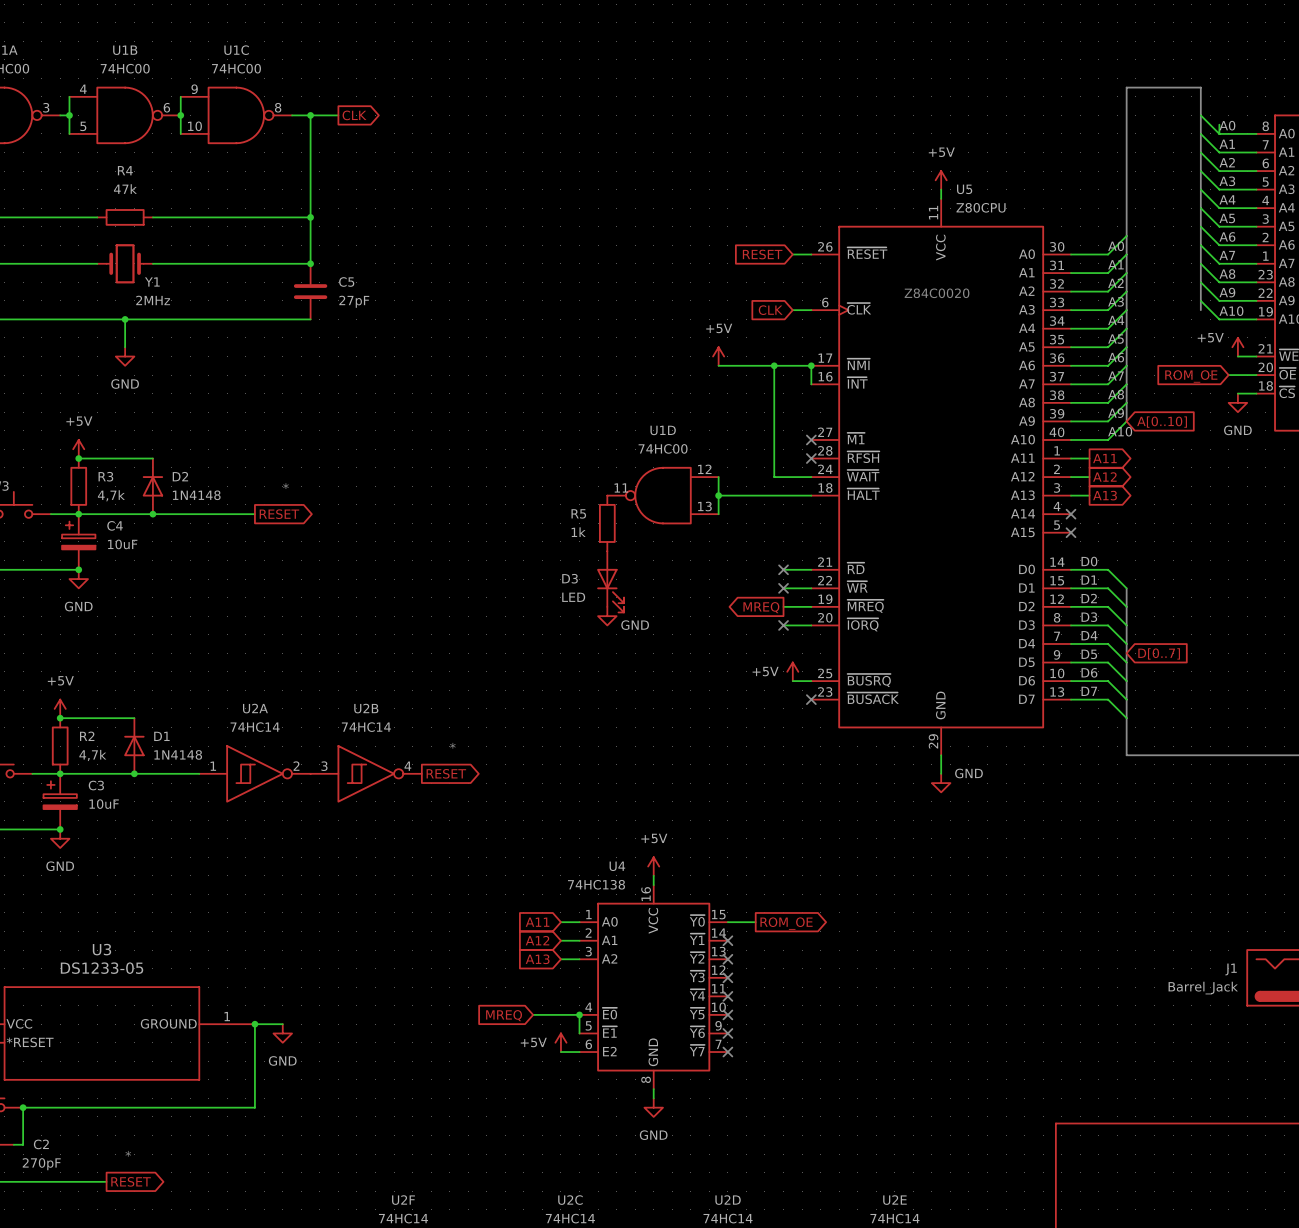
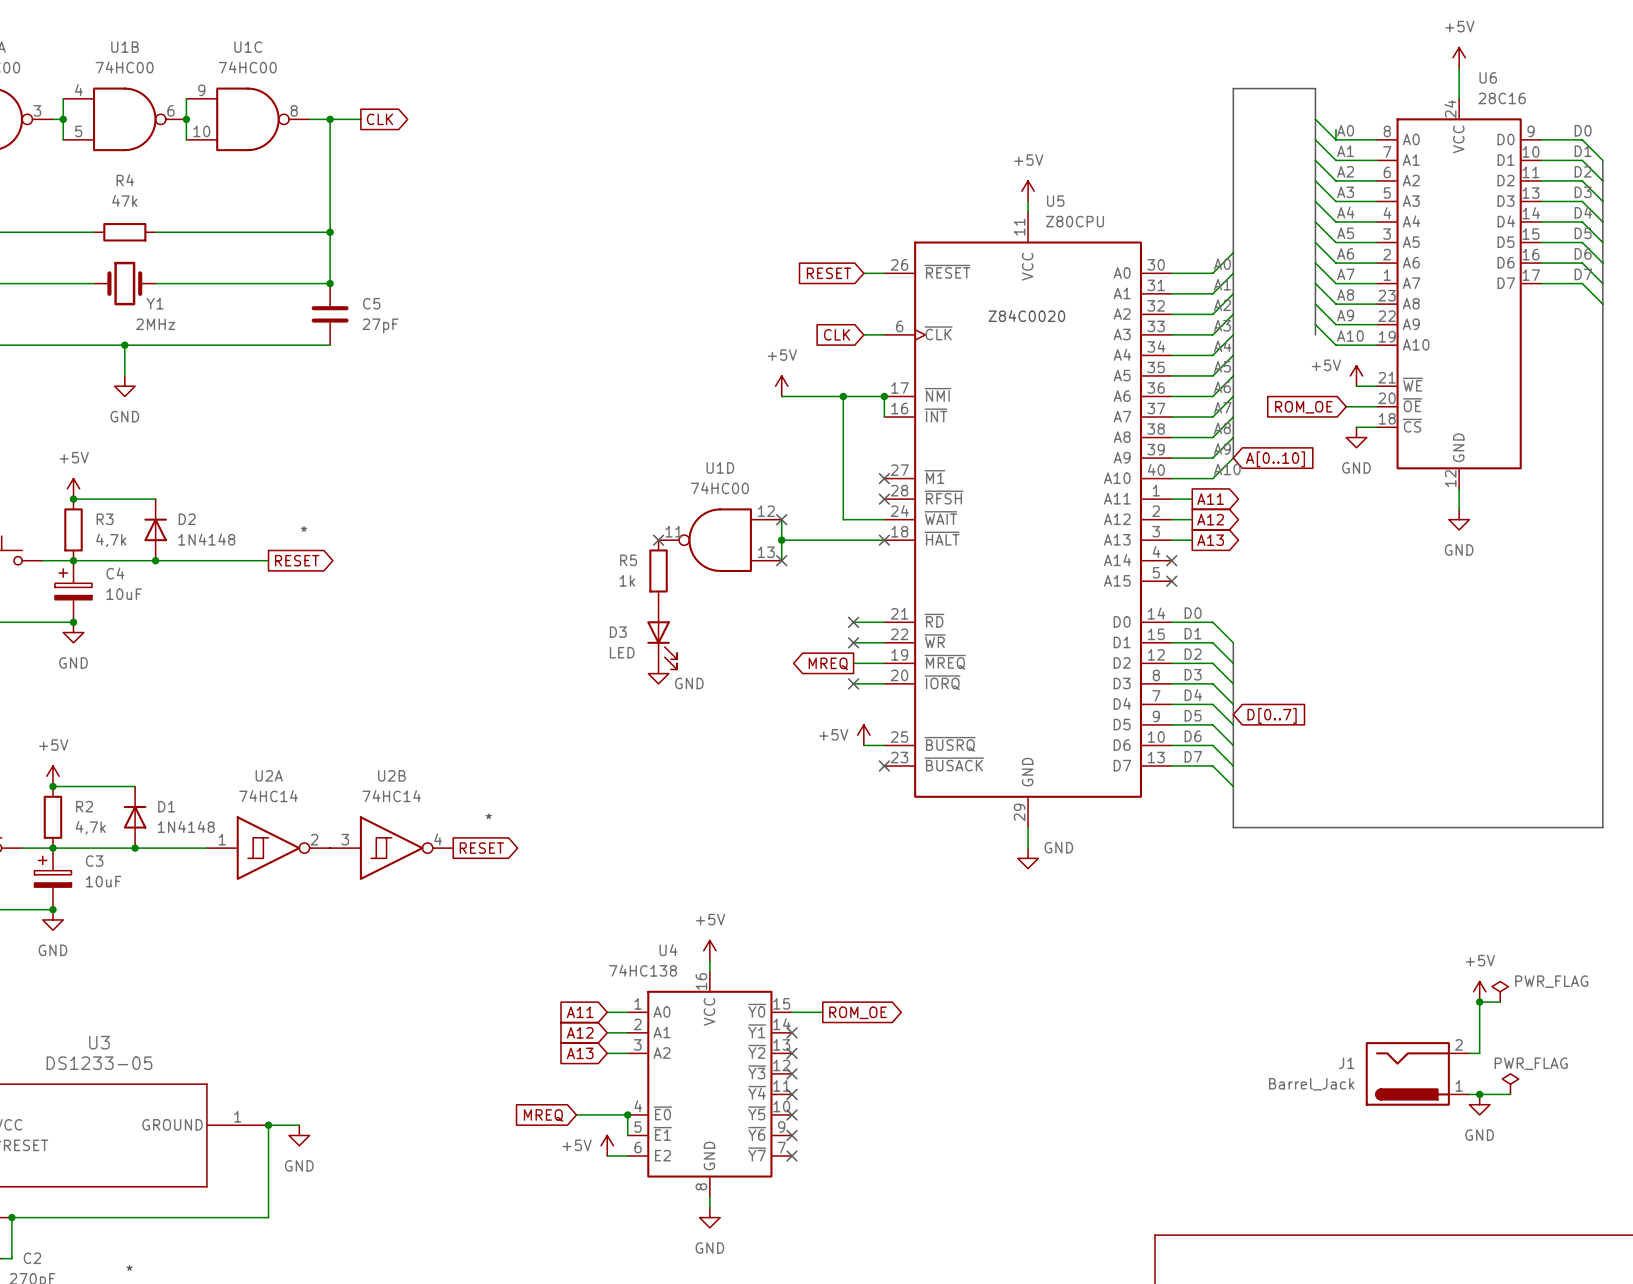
no-connect mark: none -> (781, 519)
no-connect mark: none -> (658, 540)
no-connect mark: none -> (884, 540)
no-connect mark: none -> (781, 560)

